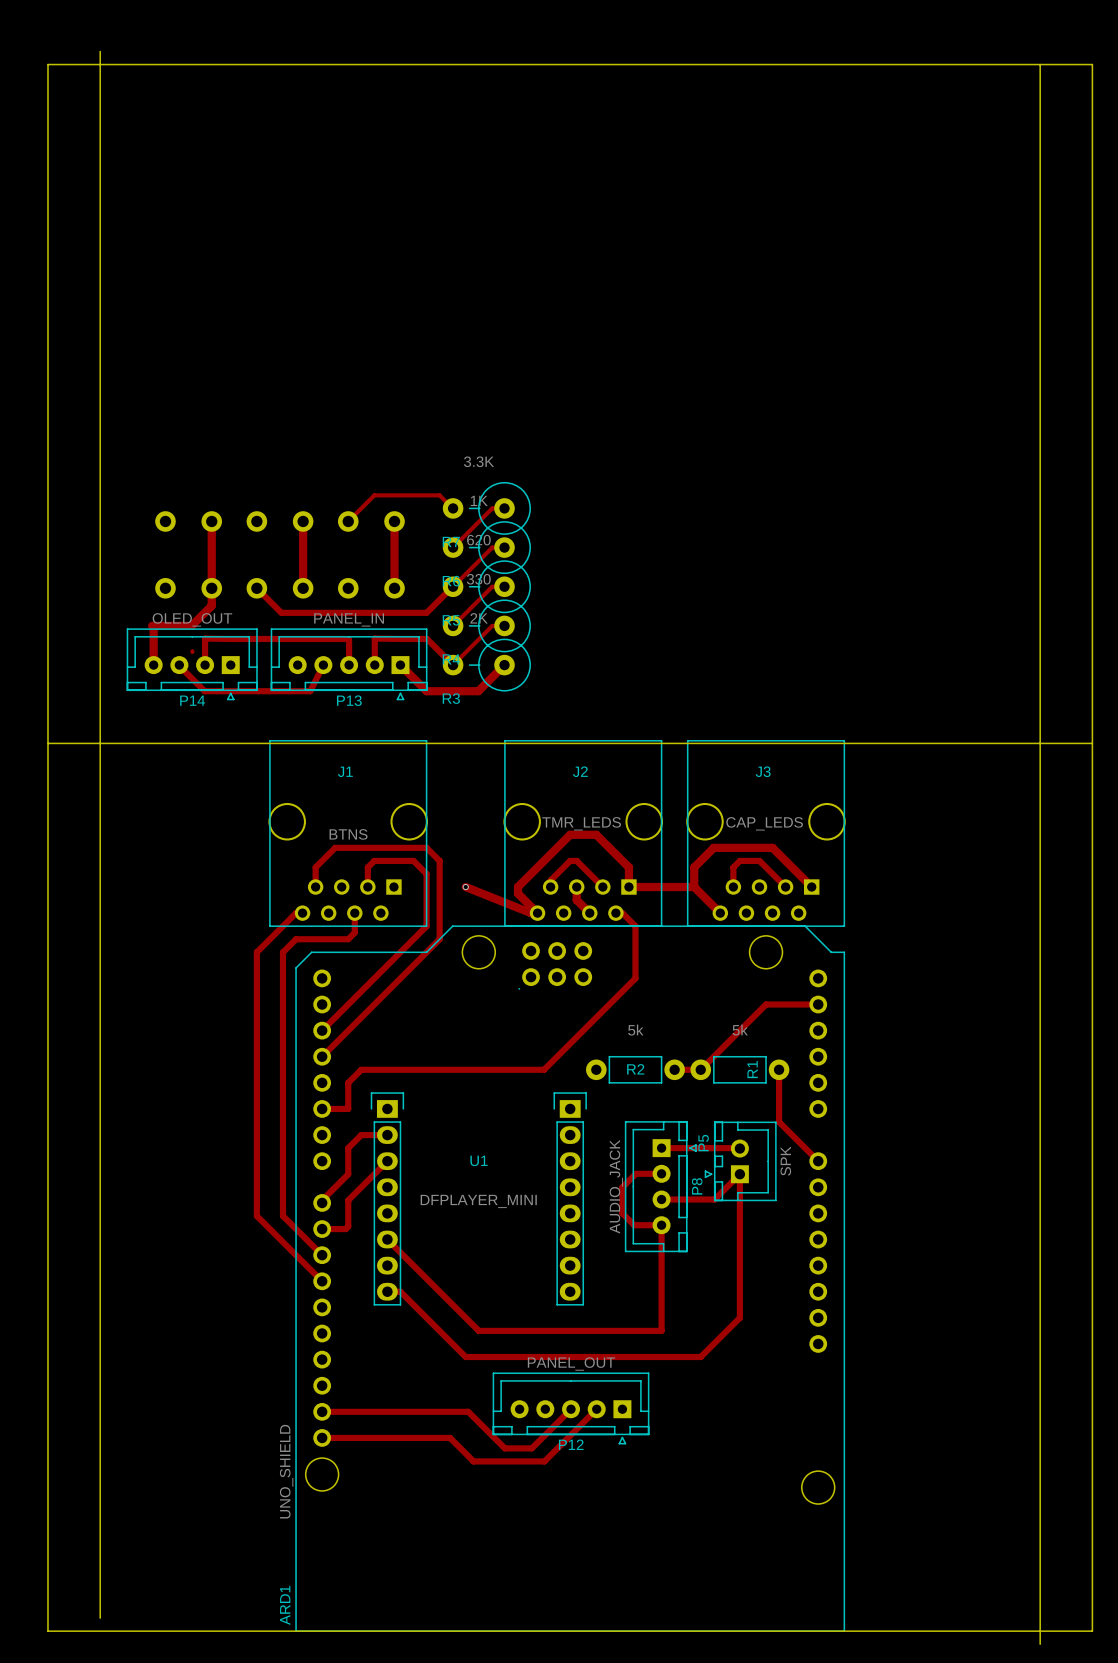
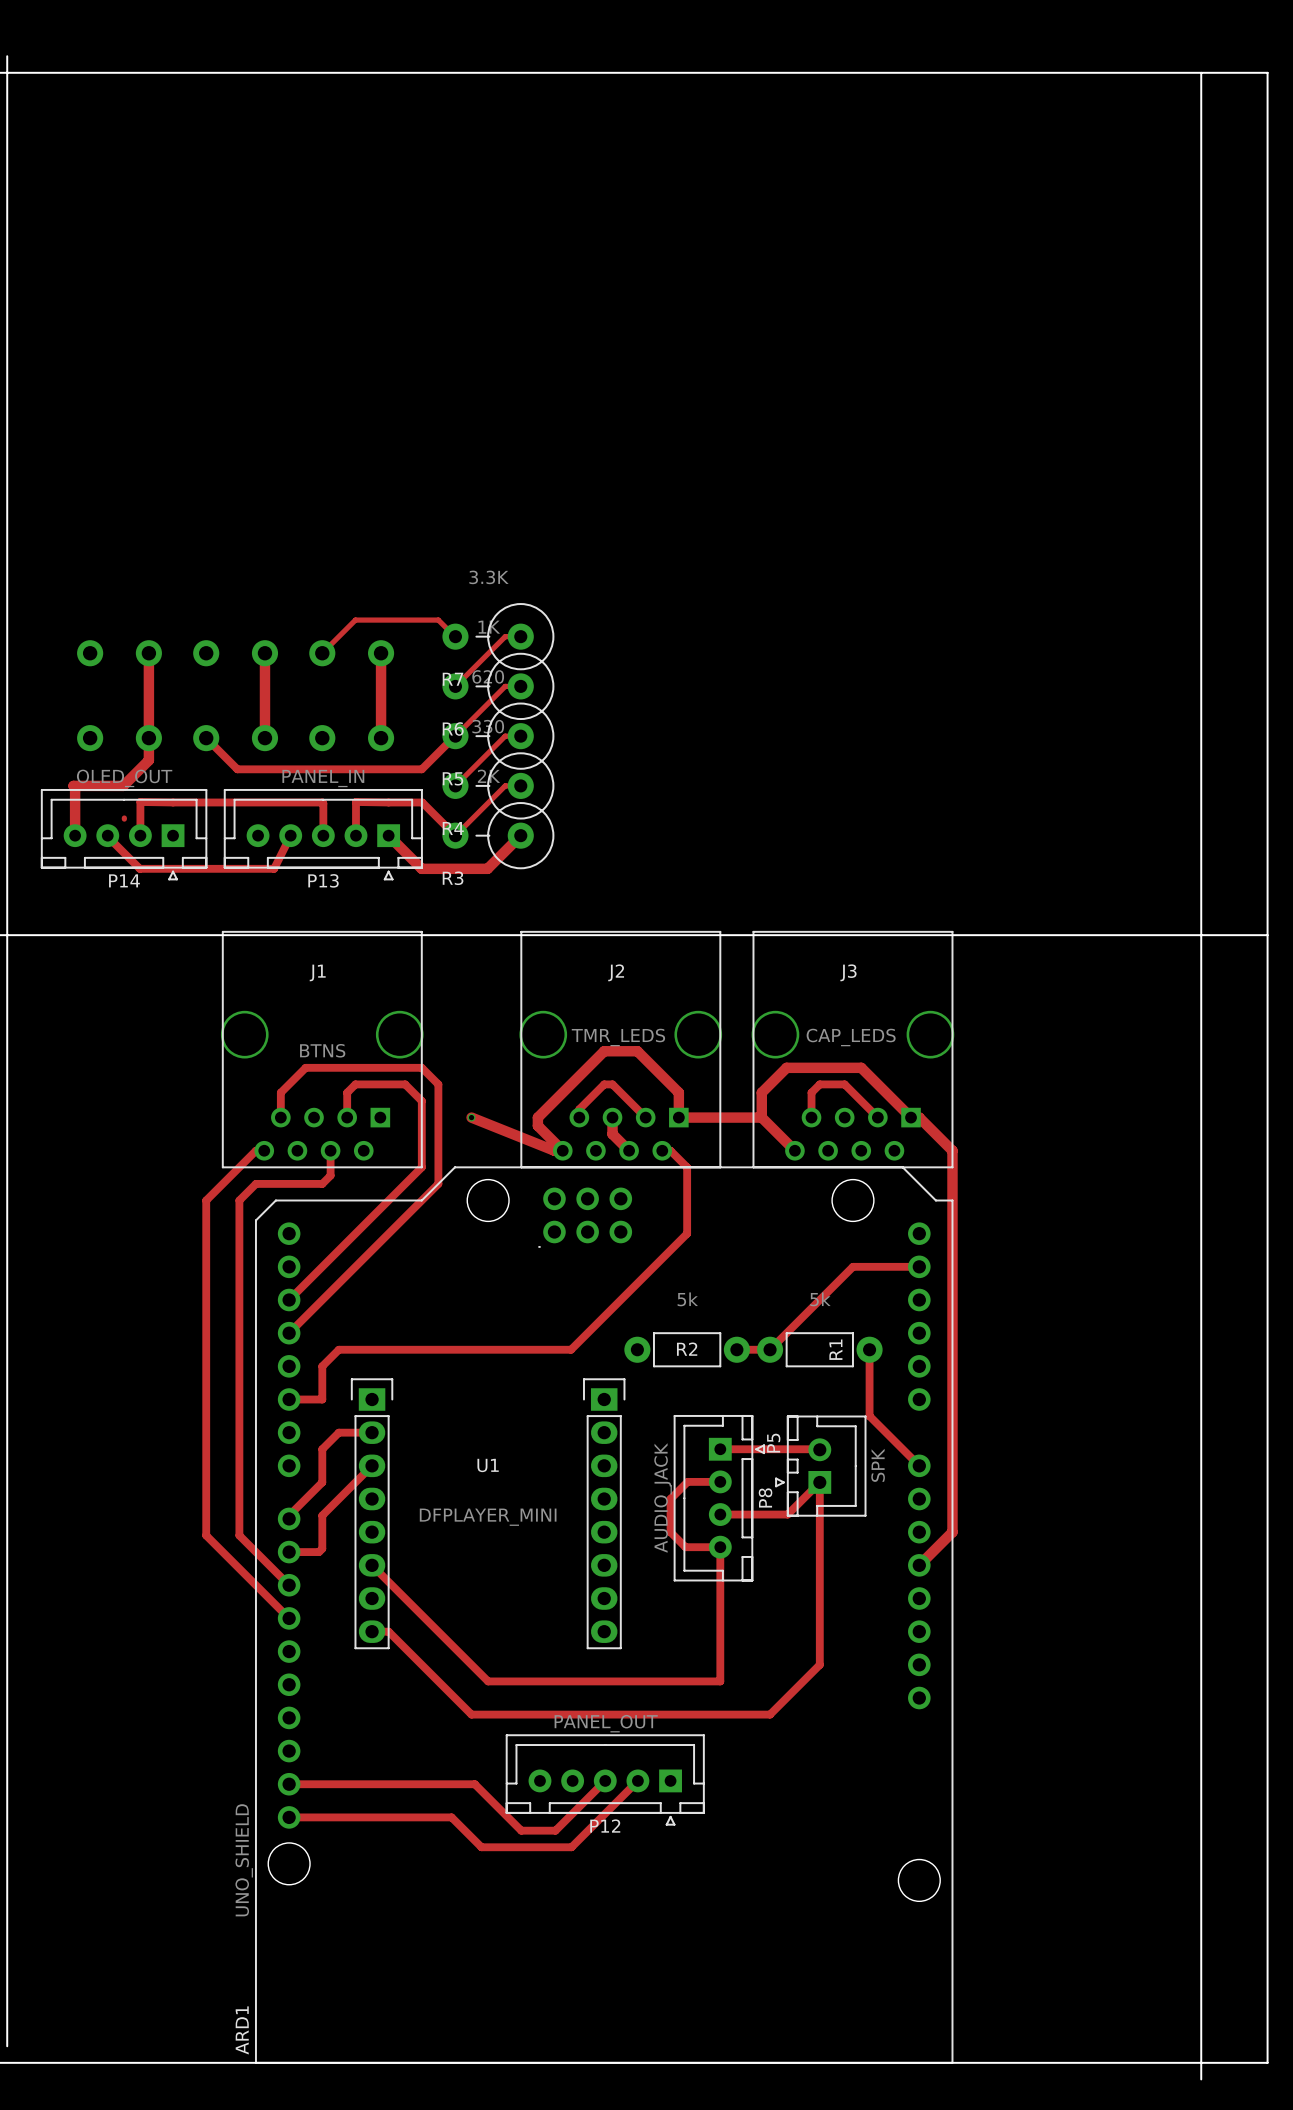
track: none -> (911, 1117) (919, 1117) (952, 1150) (952, 1532) (919, 1565)

